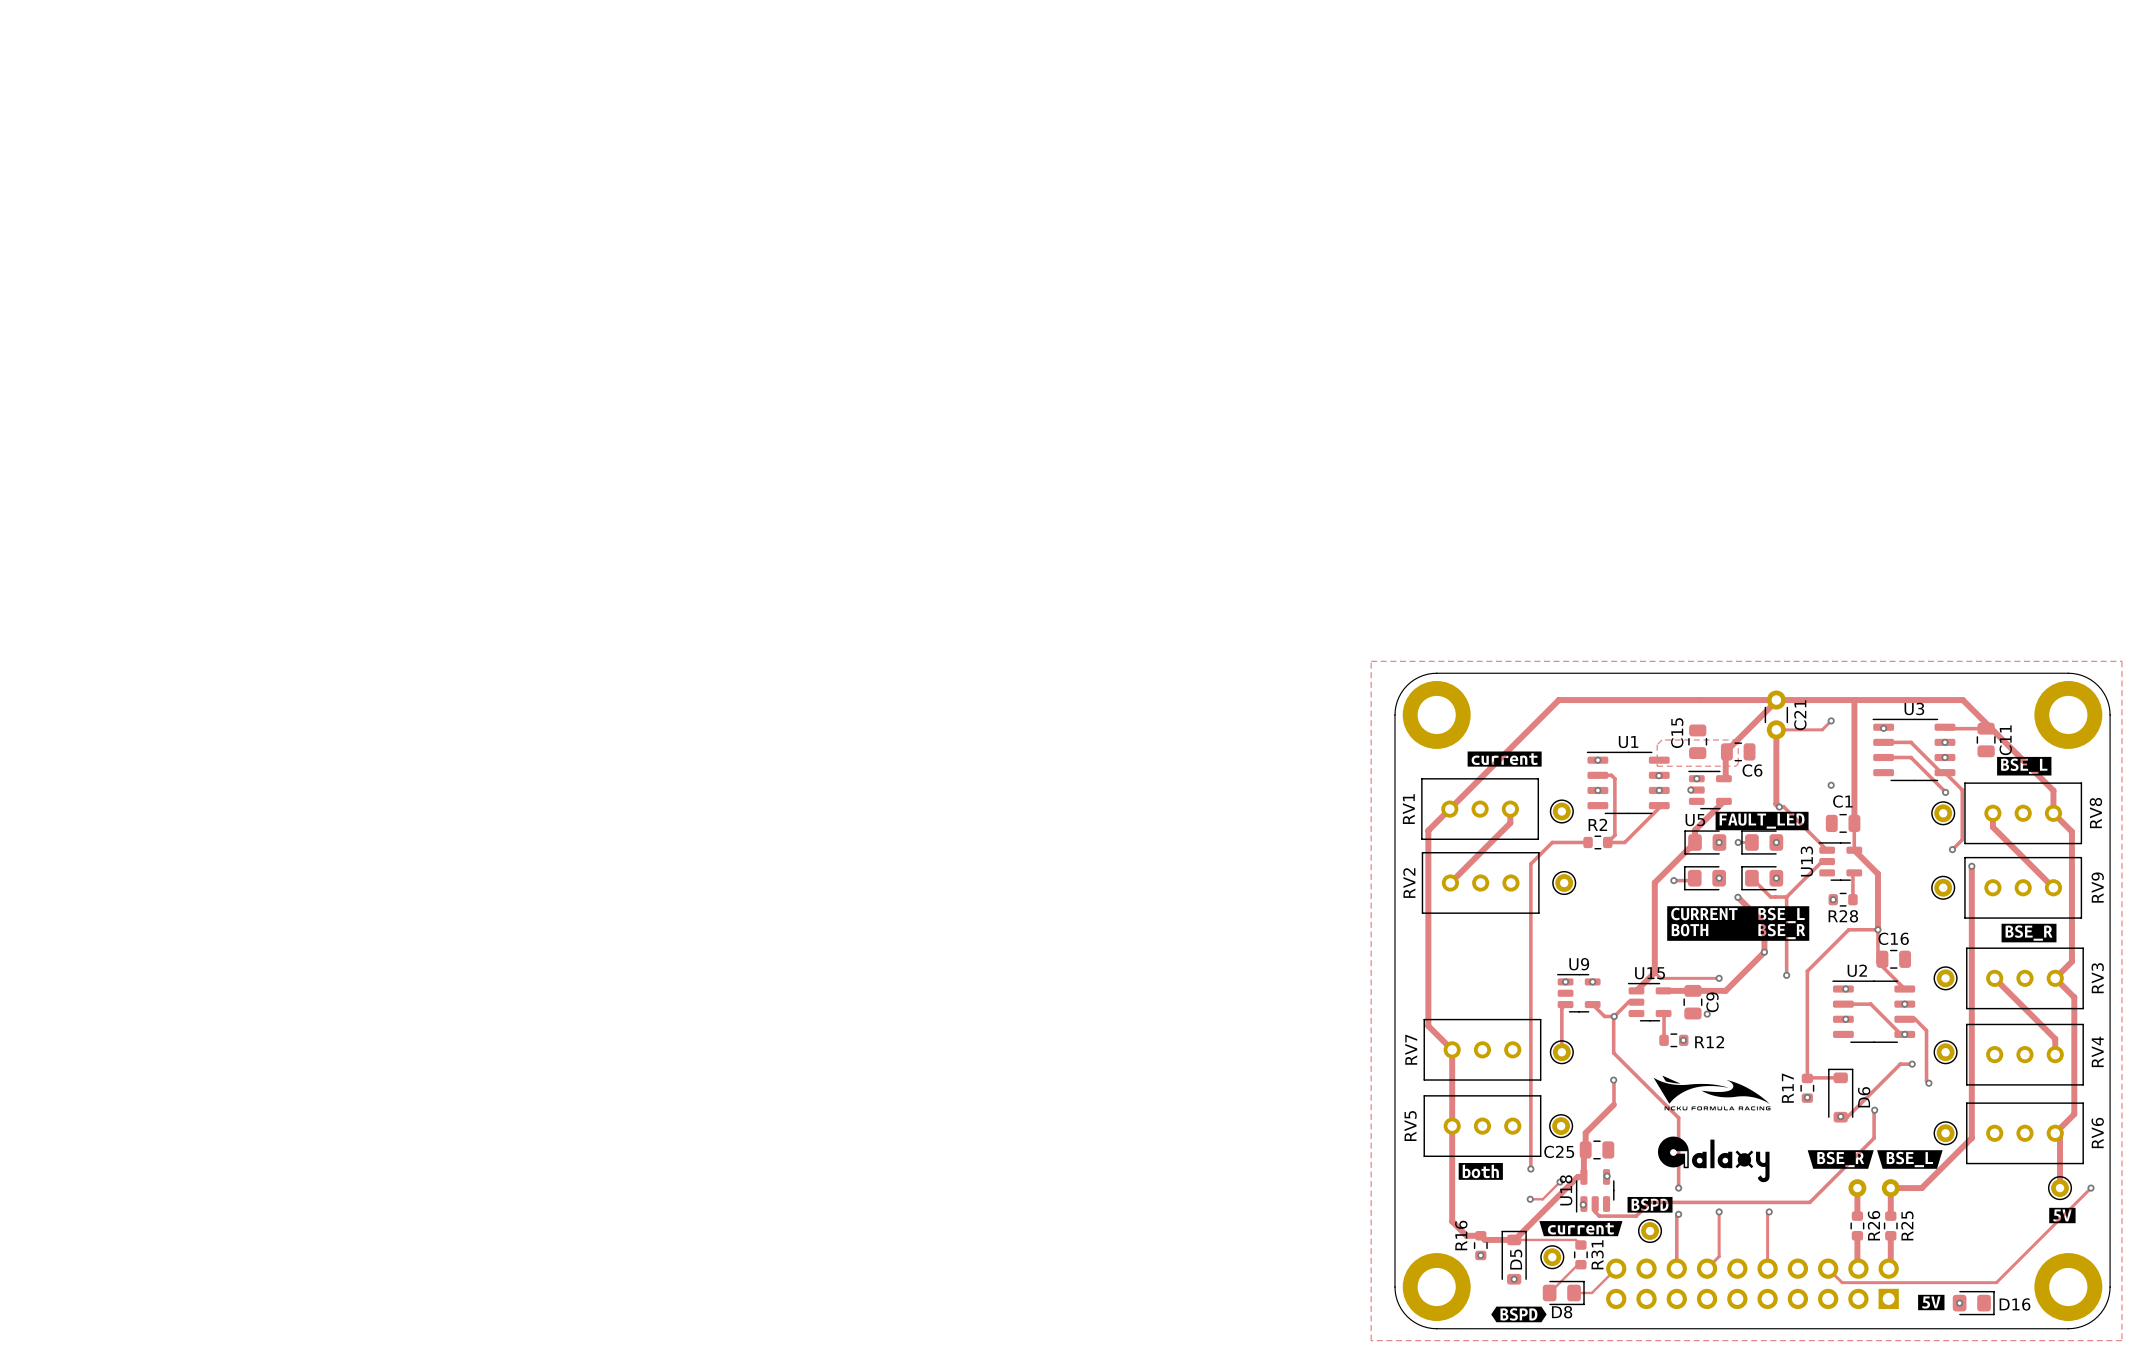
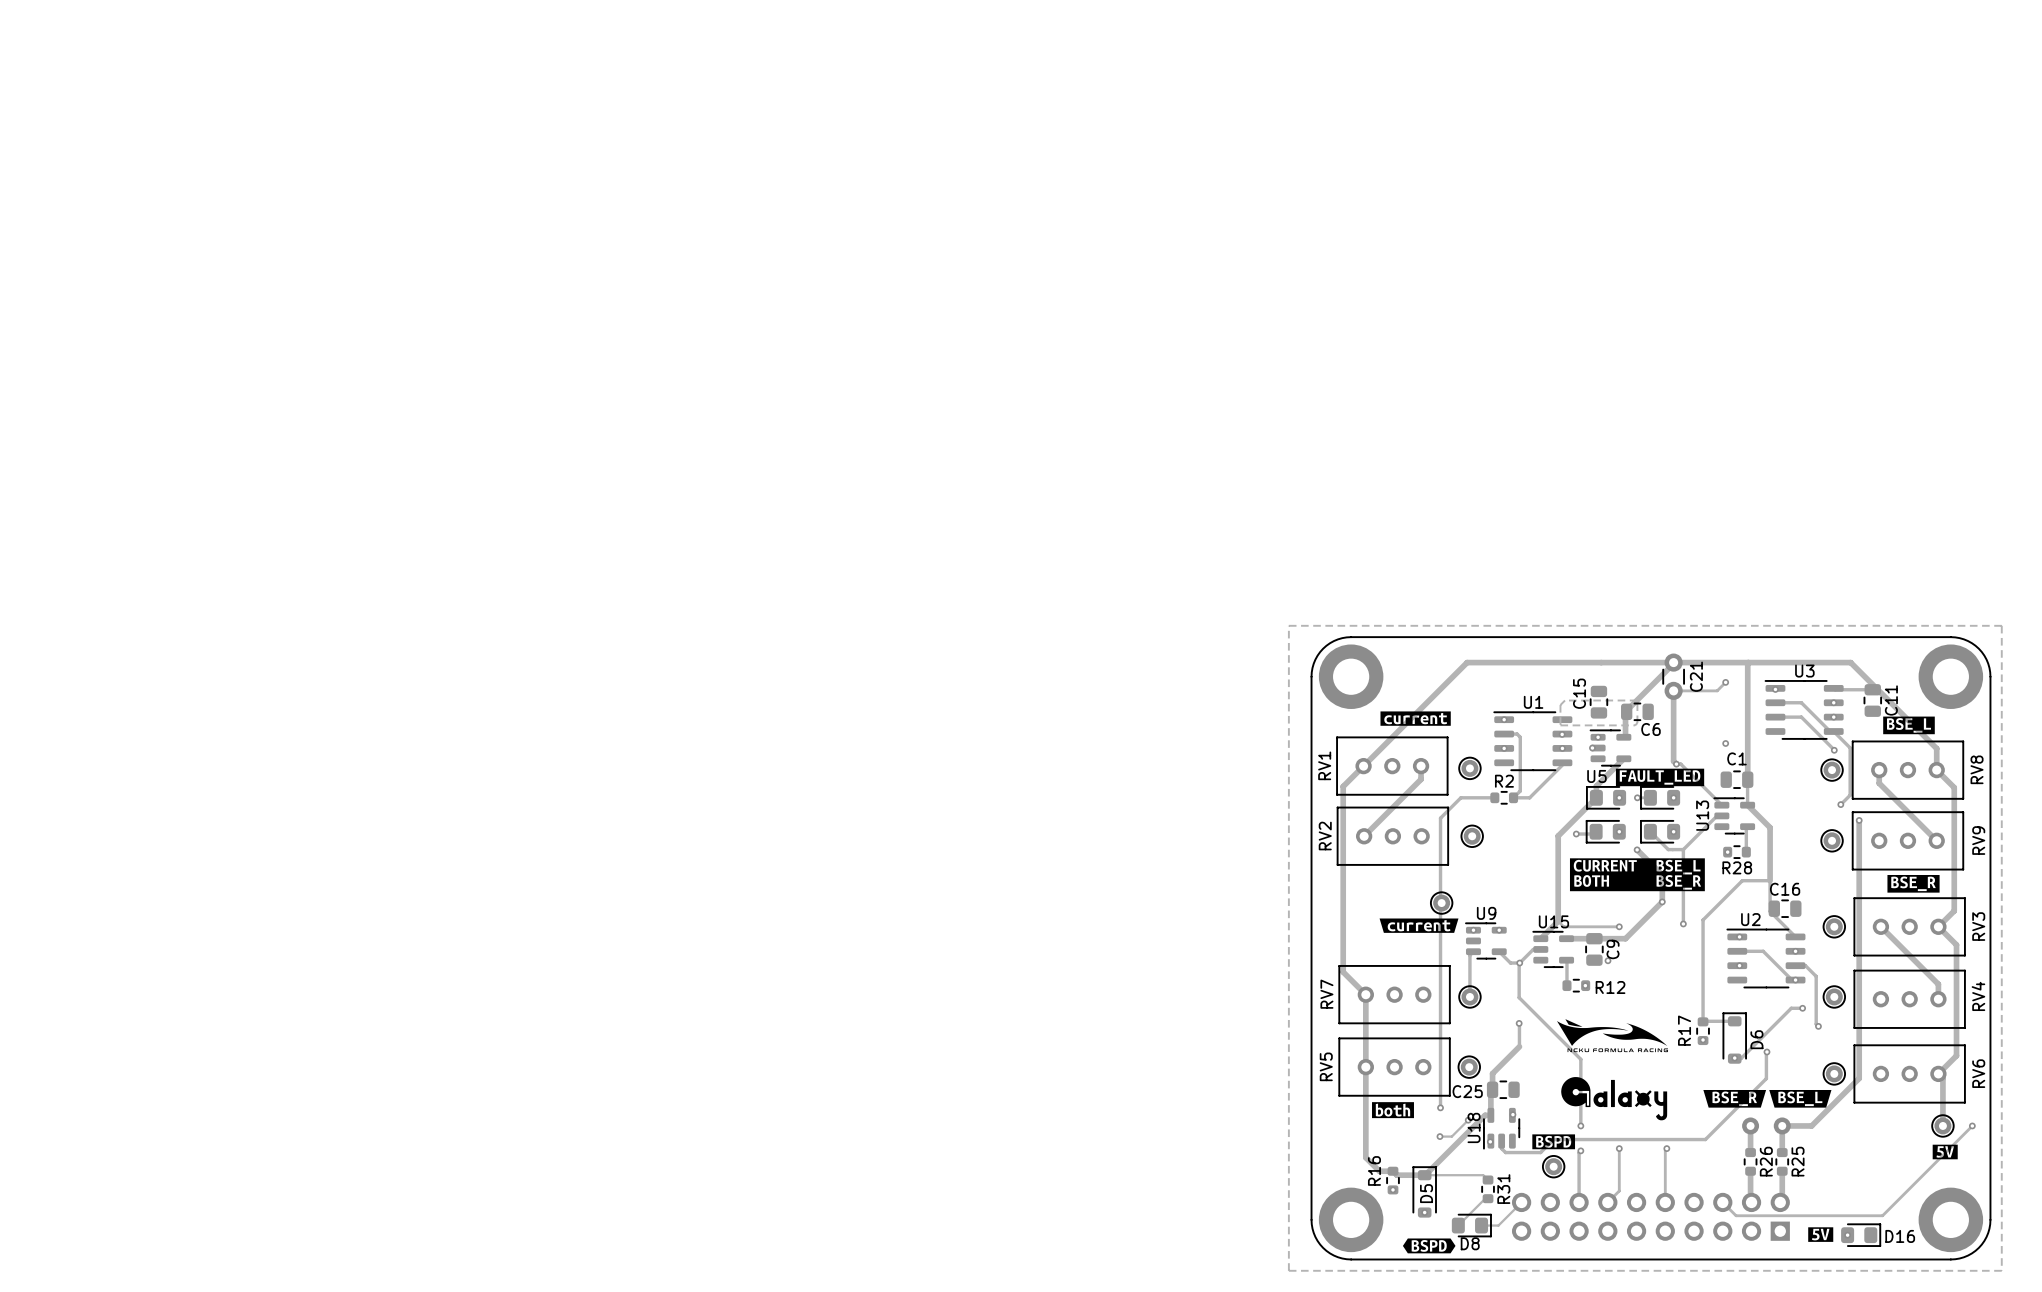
via: (1877, 929) -> none
part: none -> (1441, 903)
drawing position: (1580, 1228) -> (1419, 925)
part: (1552, 1257) -> none

